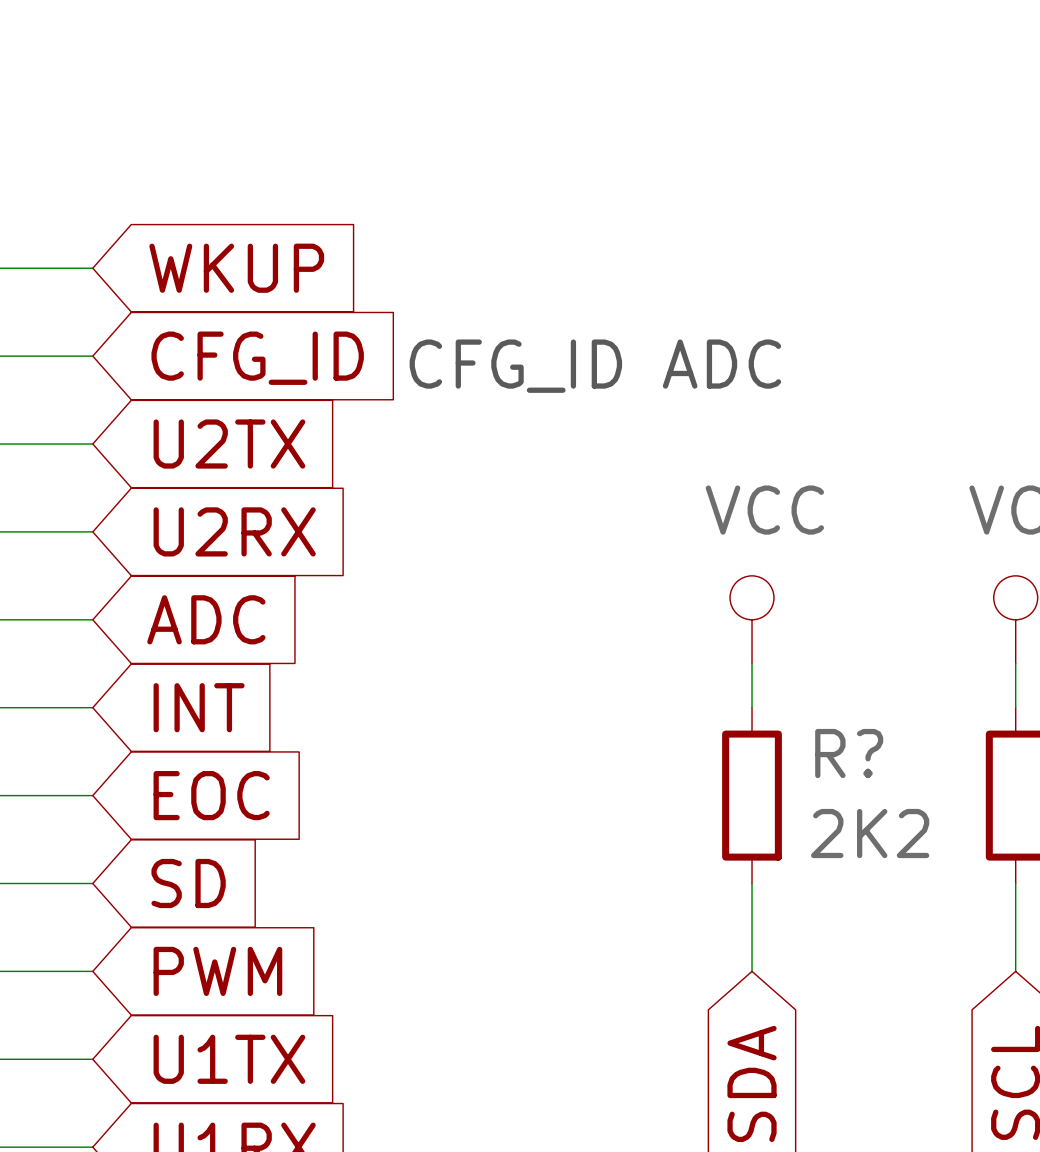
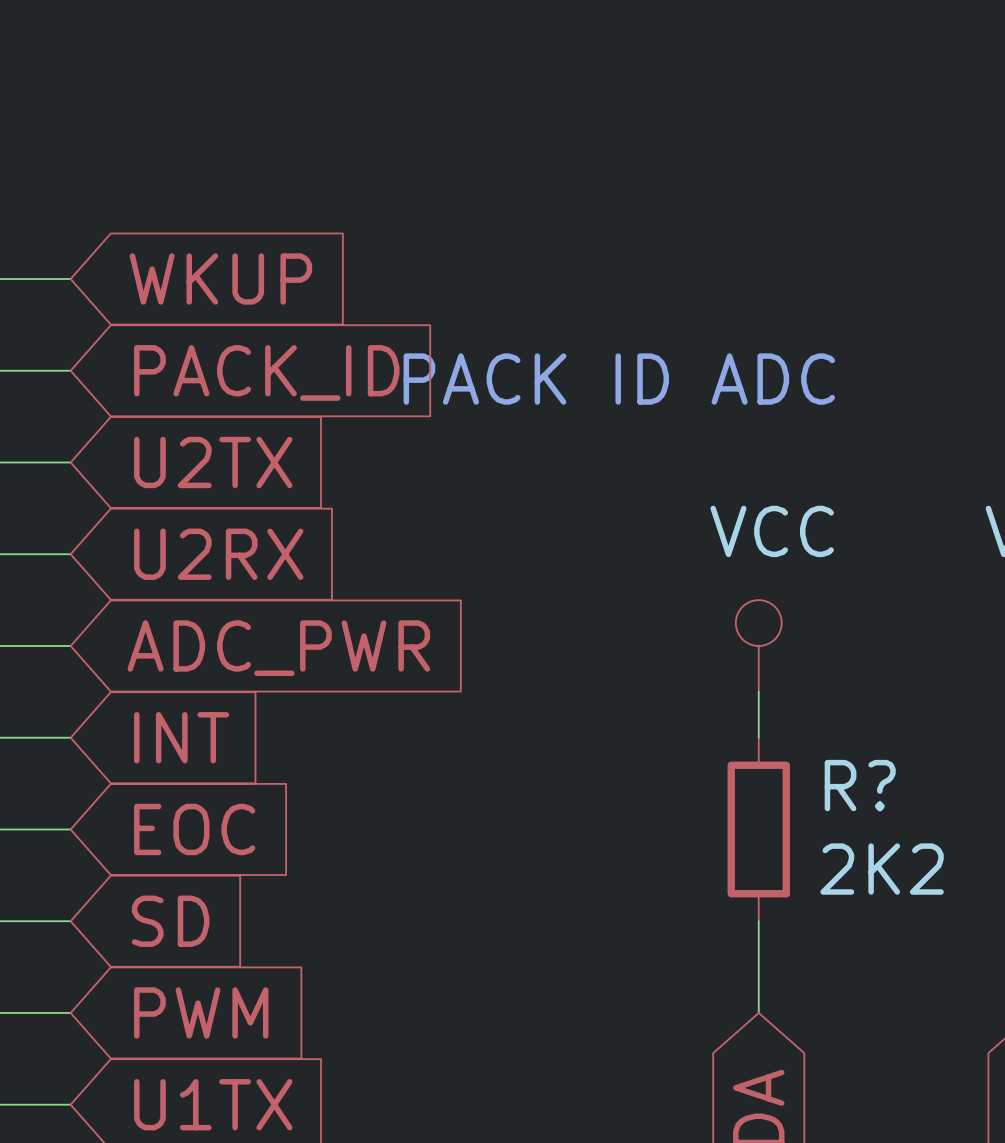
global label: CFG_ID (257, 358) -> PACK_ID (266, 372)
text: CFG_ID ADC (595, 366) -> PACK ID ADC (619, 379)
global label: ADC (206, 619) -> ADC_PWR (278, 648)

